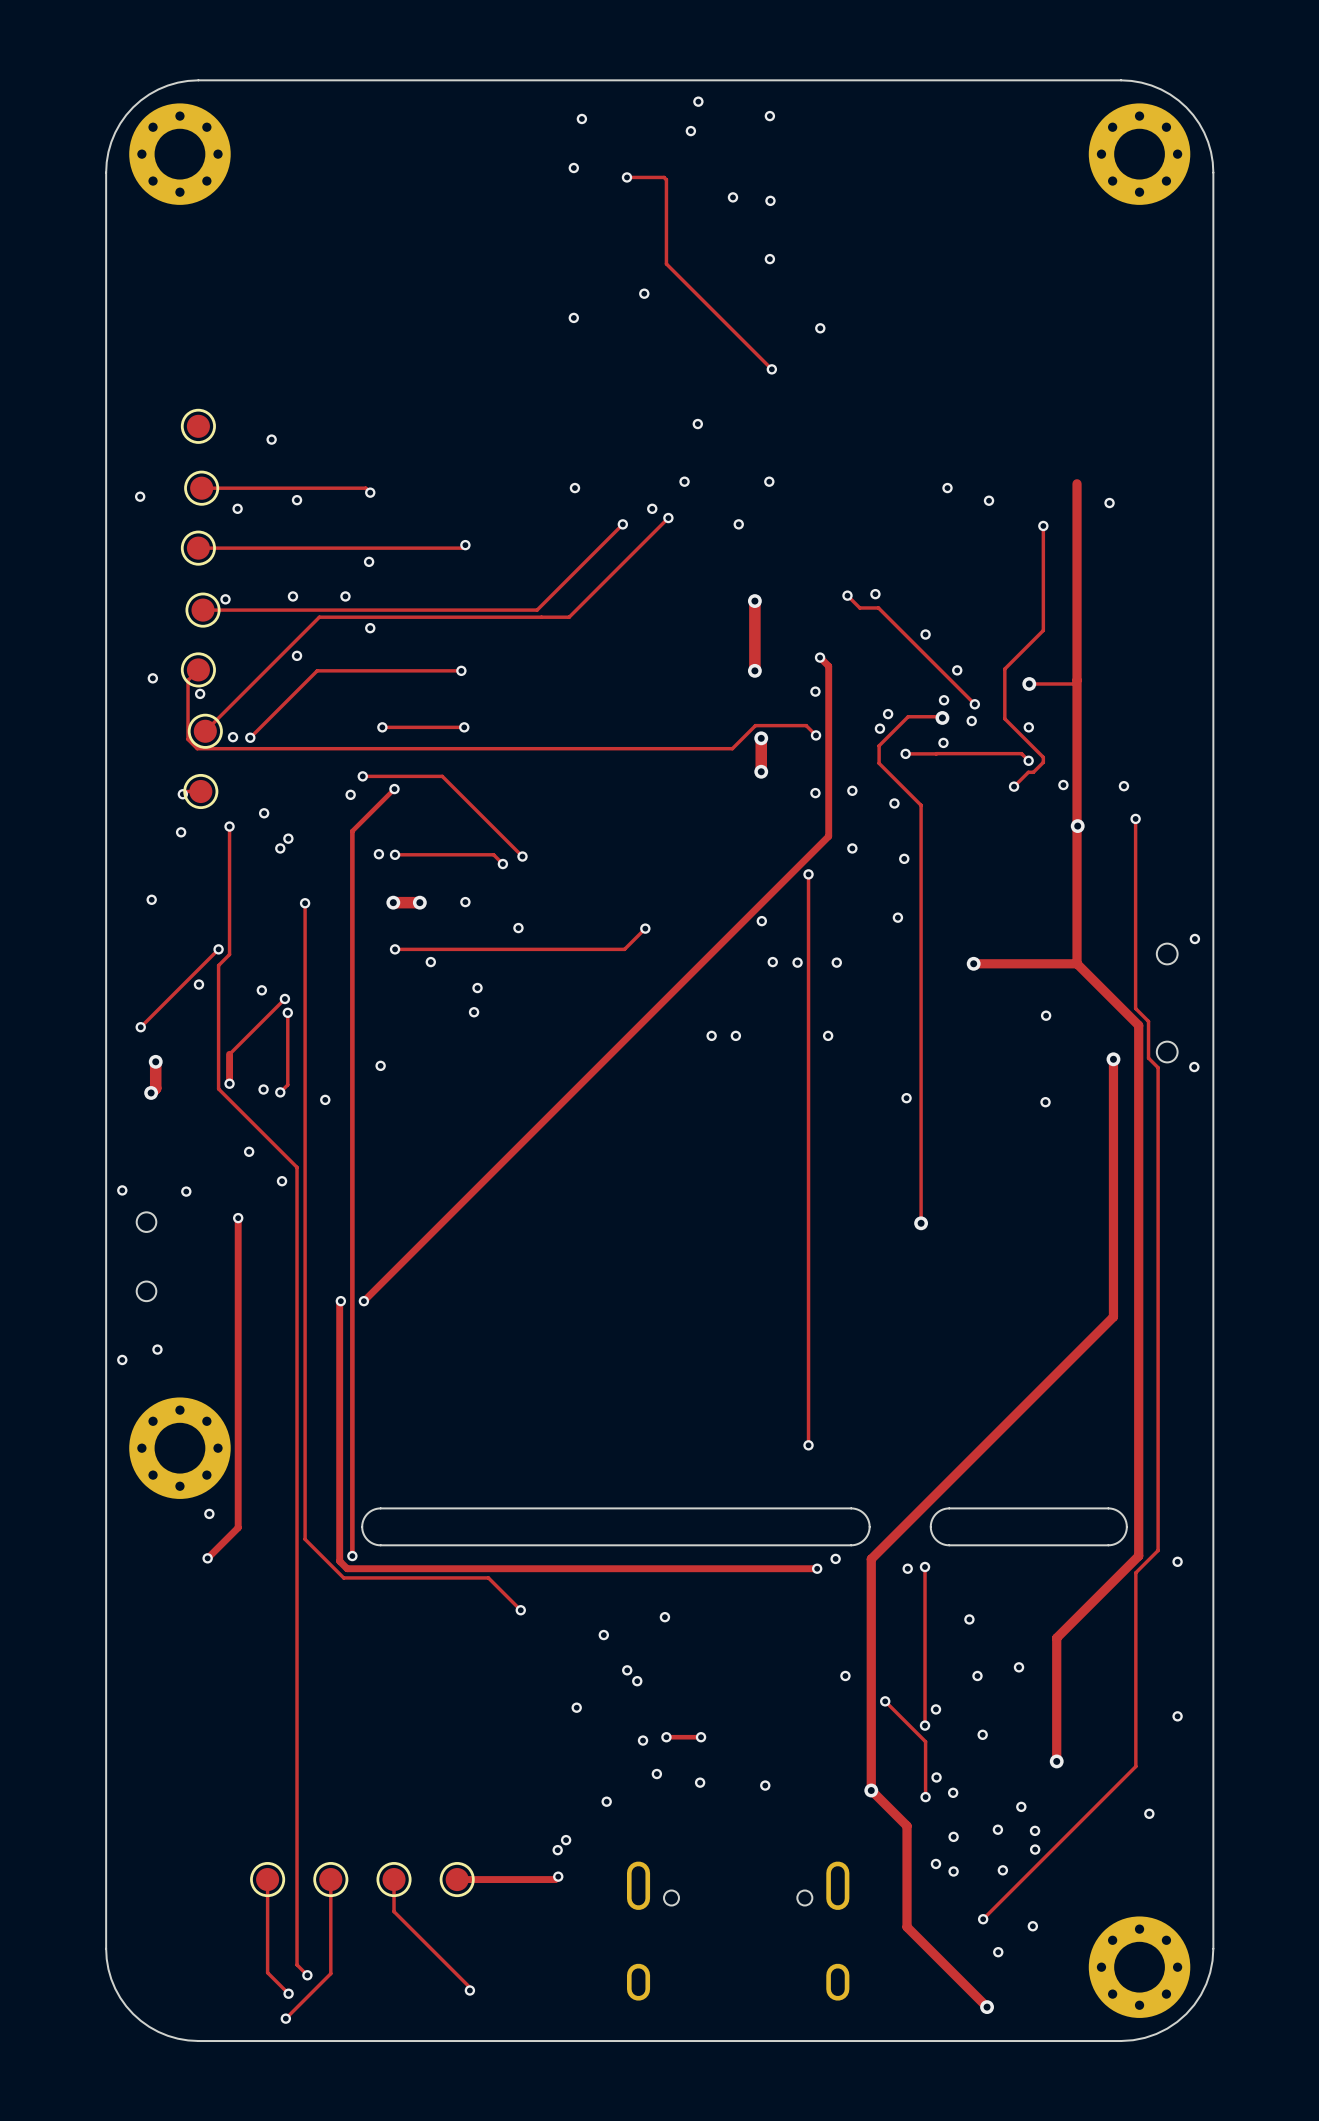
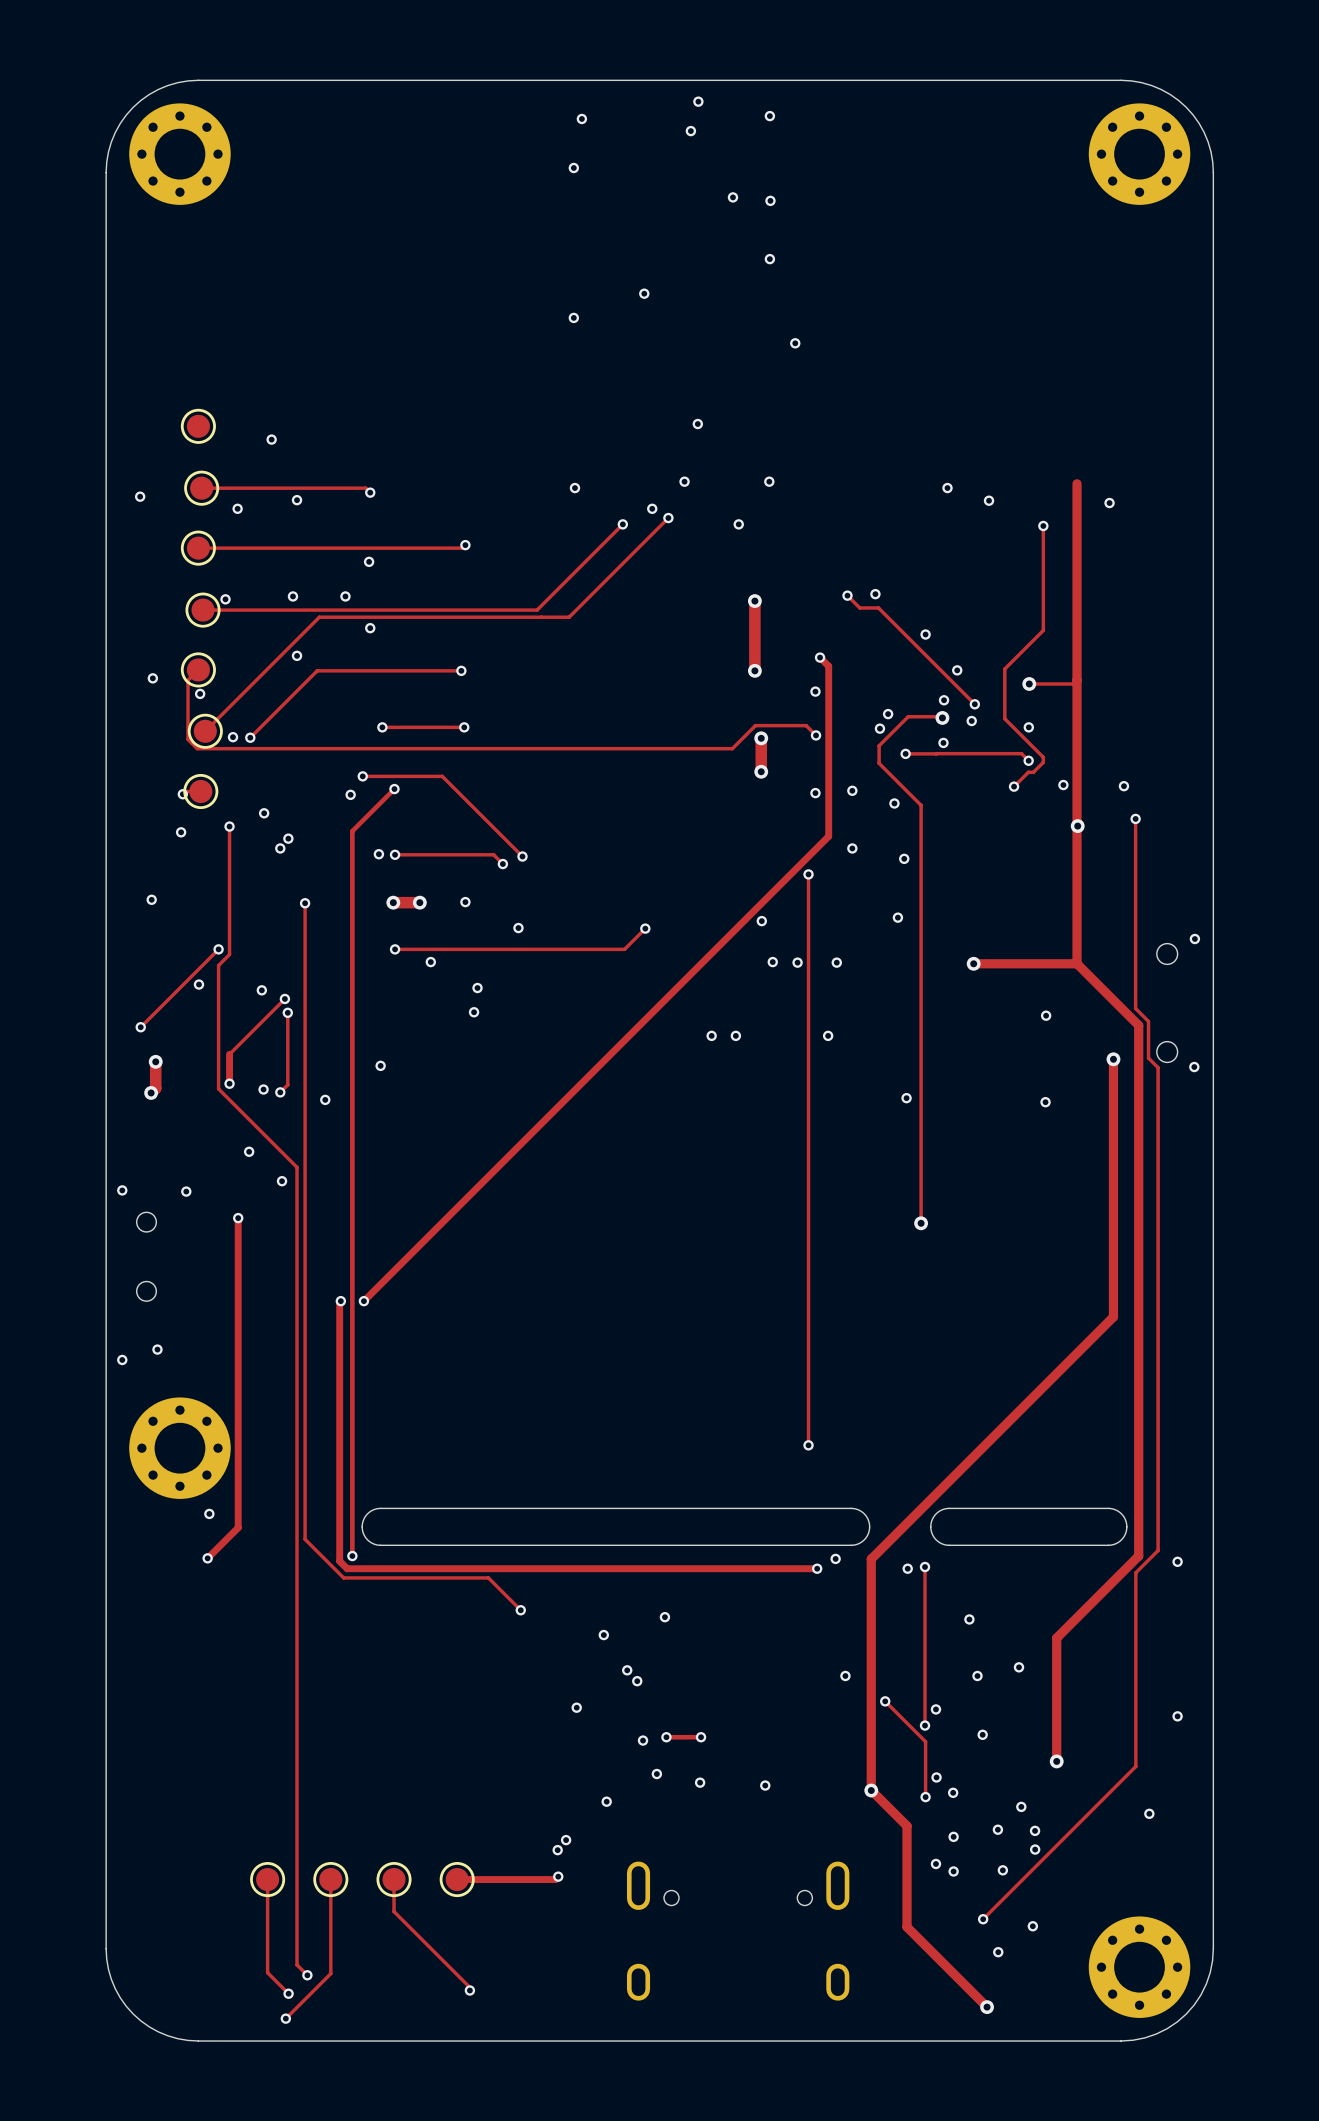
track: (626, 177) (664, 177) (666, 179) (666, 263) (771, 369) -> none
via: (626, 177) -> none
via: (820, 328) -> none
via: none -> (795, 343)
via: (771, 369) -> none

